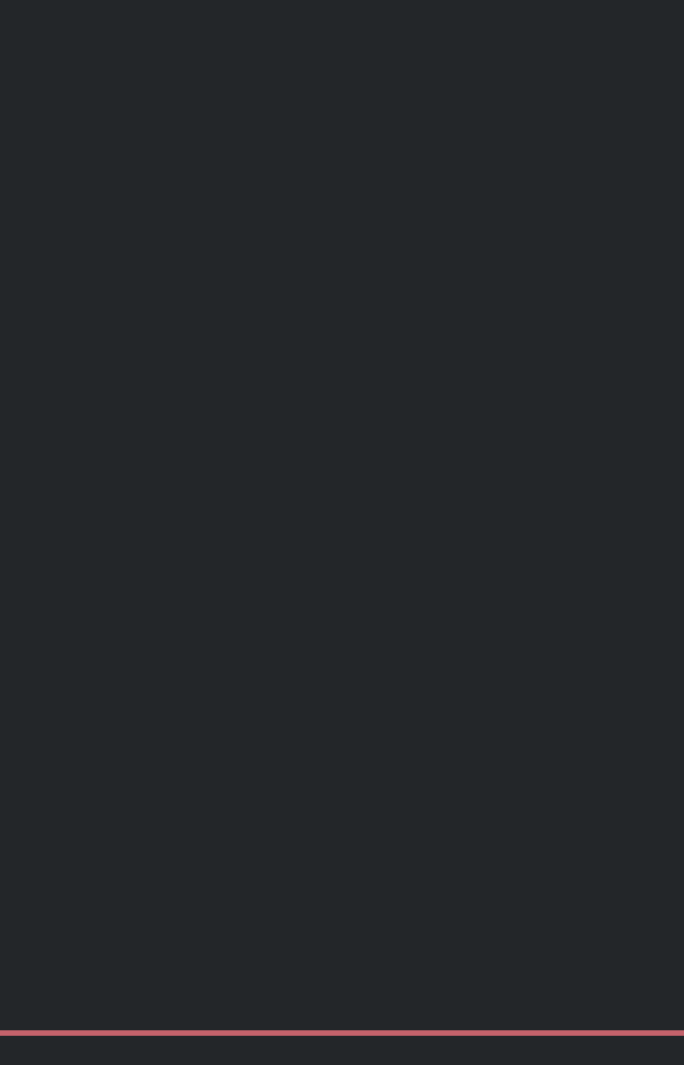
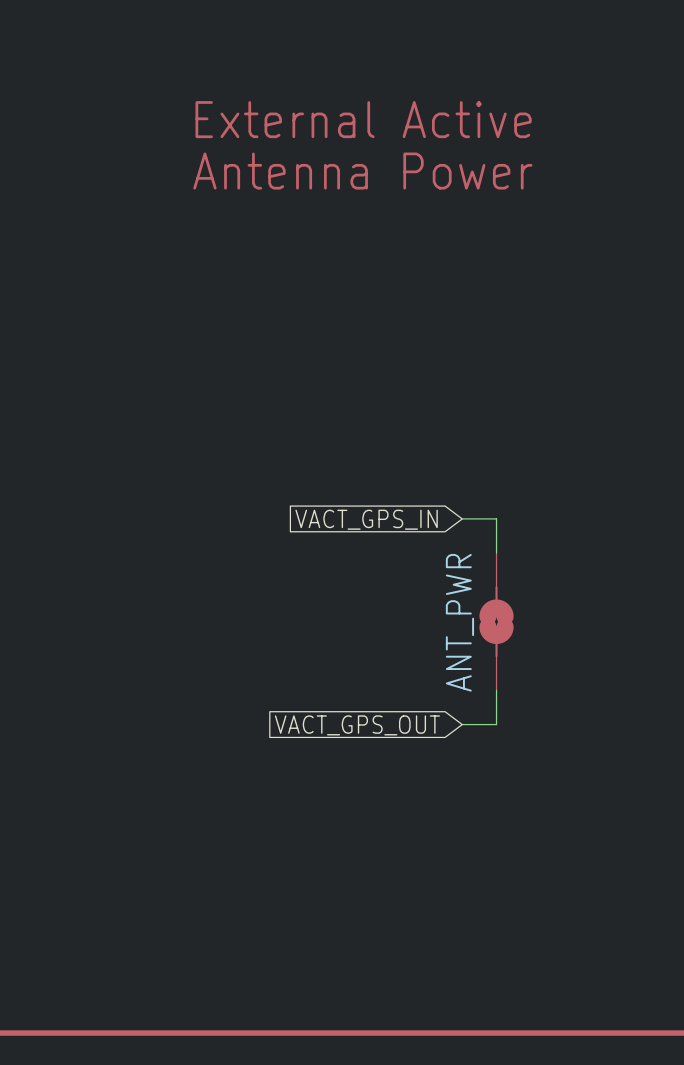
text: none -> External Active (363, 119)
text: none -> Antenna Power (362, 171)
wire: none -> (462, 518) (496, 518) (496, 553)
global label: none -> VACT_GPS_IN (366, 519)
ANT_PWR: none -> (496, 621)
wire: none -> (496, 690) (496, 724) (462, 724)
global label: none -> VACT_GPS_OUT (357, 725)

